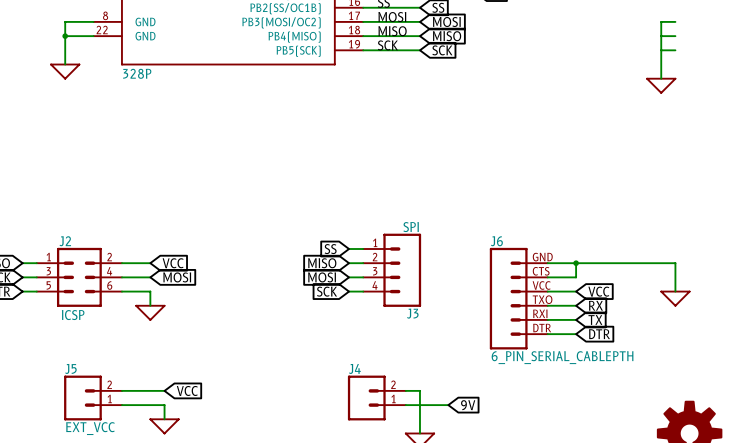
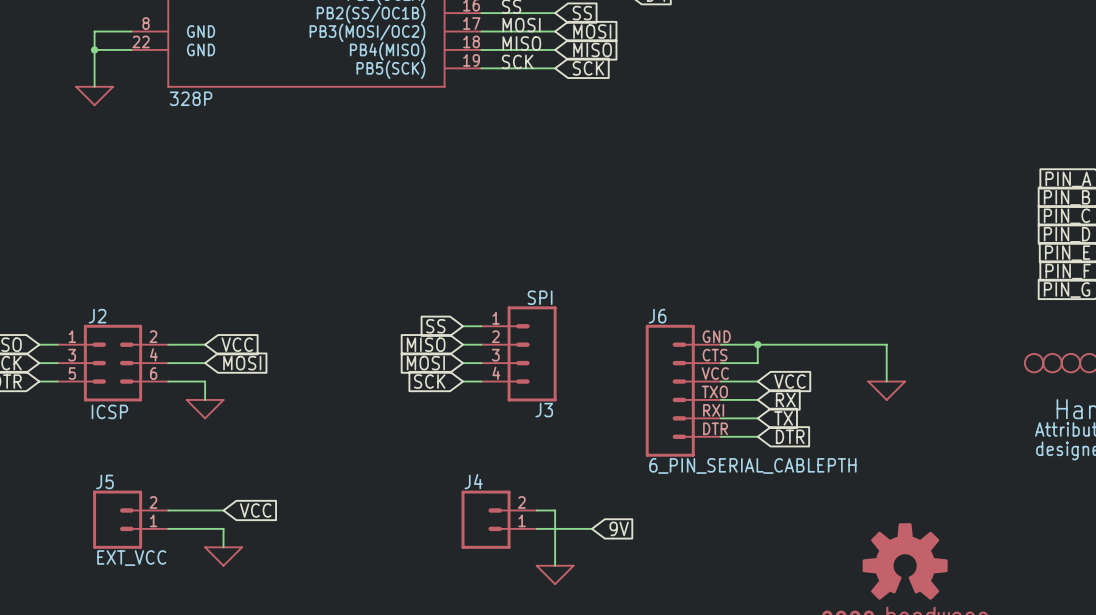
wire: (675, 21) (661, 21) (661, 78) -> none
wire: (661, 36) (675, 36) -> none
wire: (661, 50) (675, 50) -> none
power symbol: (661, 85) -> none

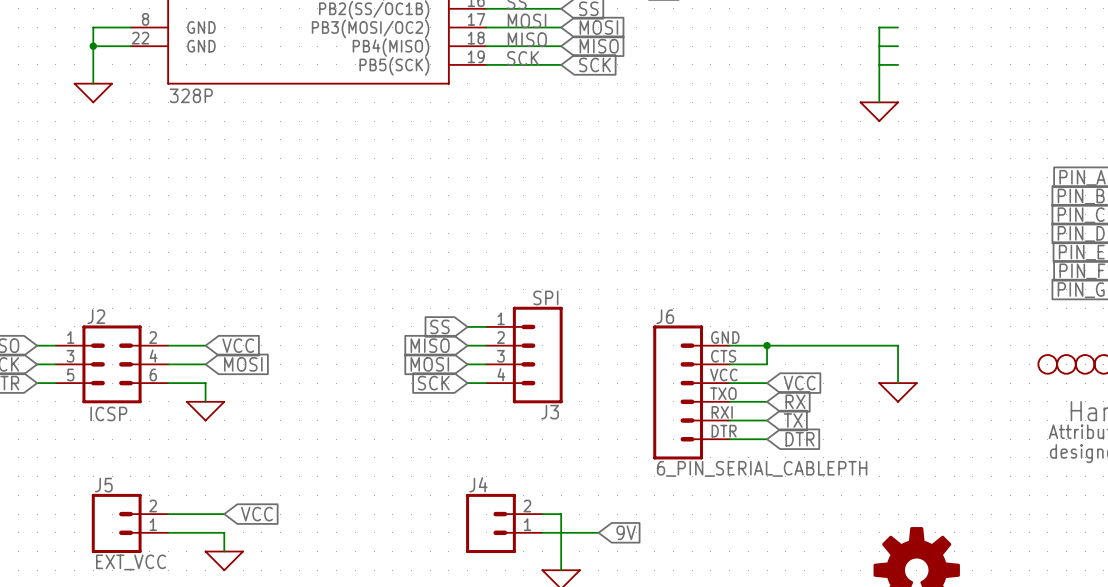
wire: none -> (898, 27) (879, 27) (879, 102)
wire: none -> (879, 46) (898, 46)
wire: none -> (879, 64) (898, 64)
power symbol: none -> (879, 111)

